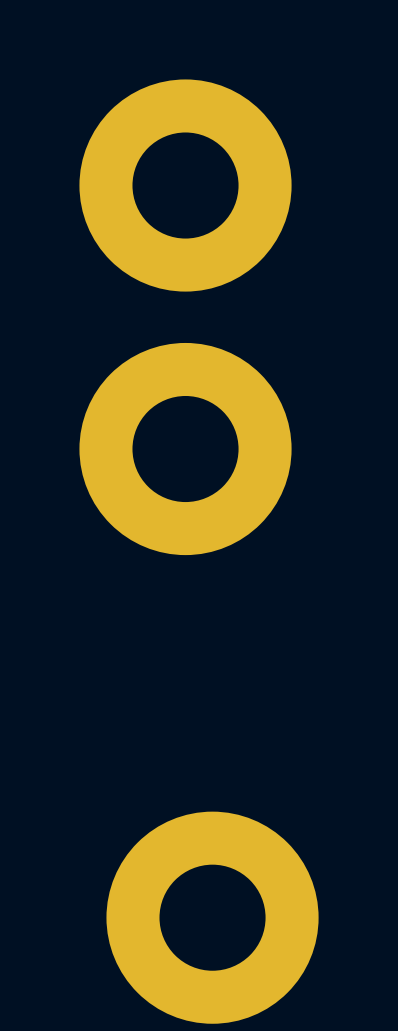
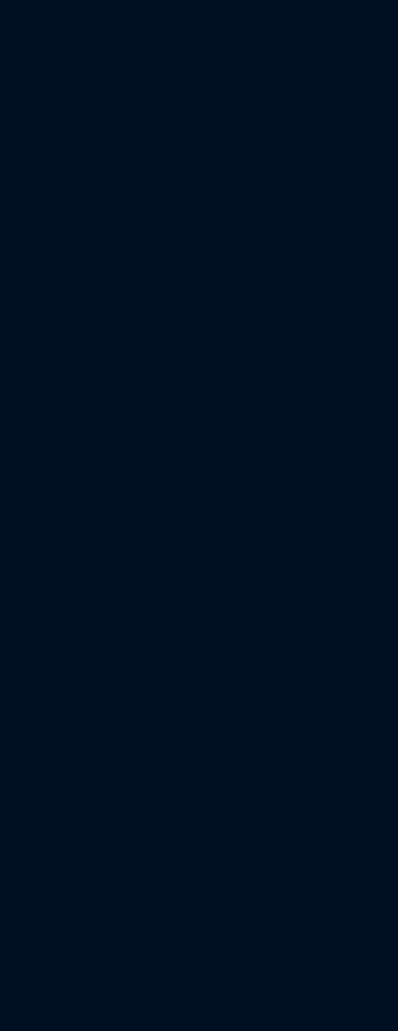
part: (185, 185) -> none
part: (185, 449) -> none
part: (212, 917) -> none

